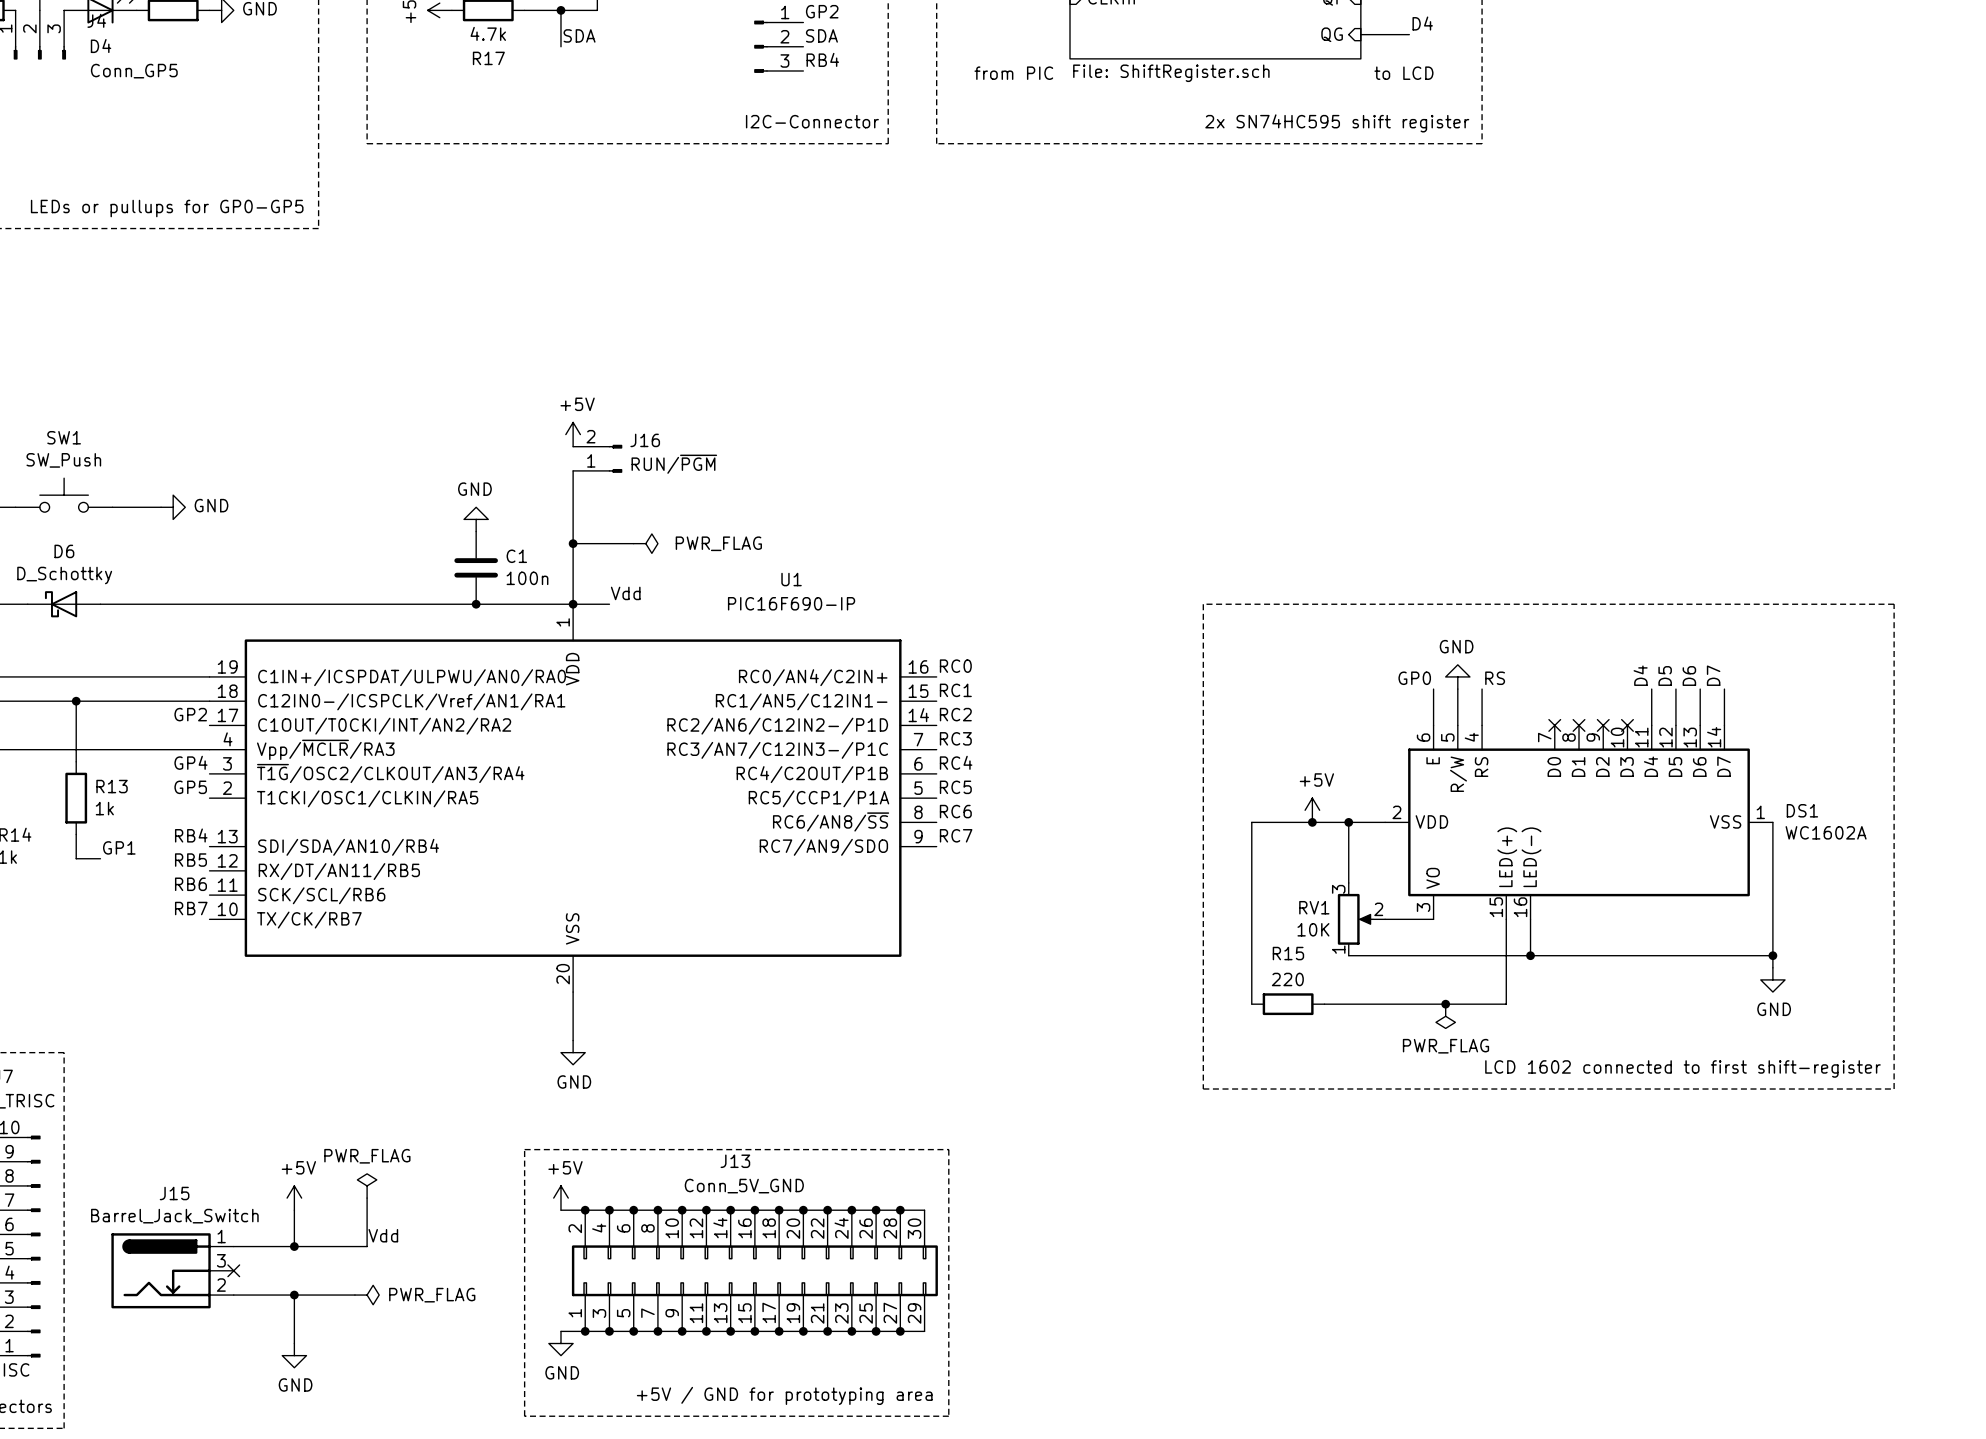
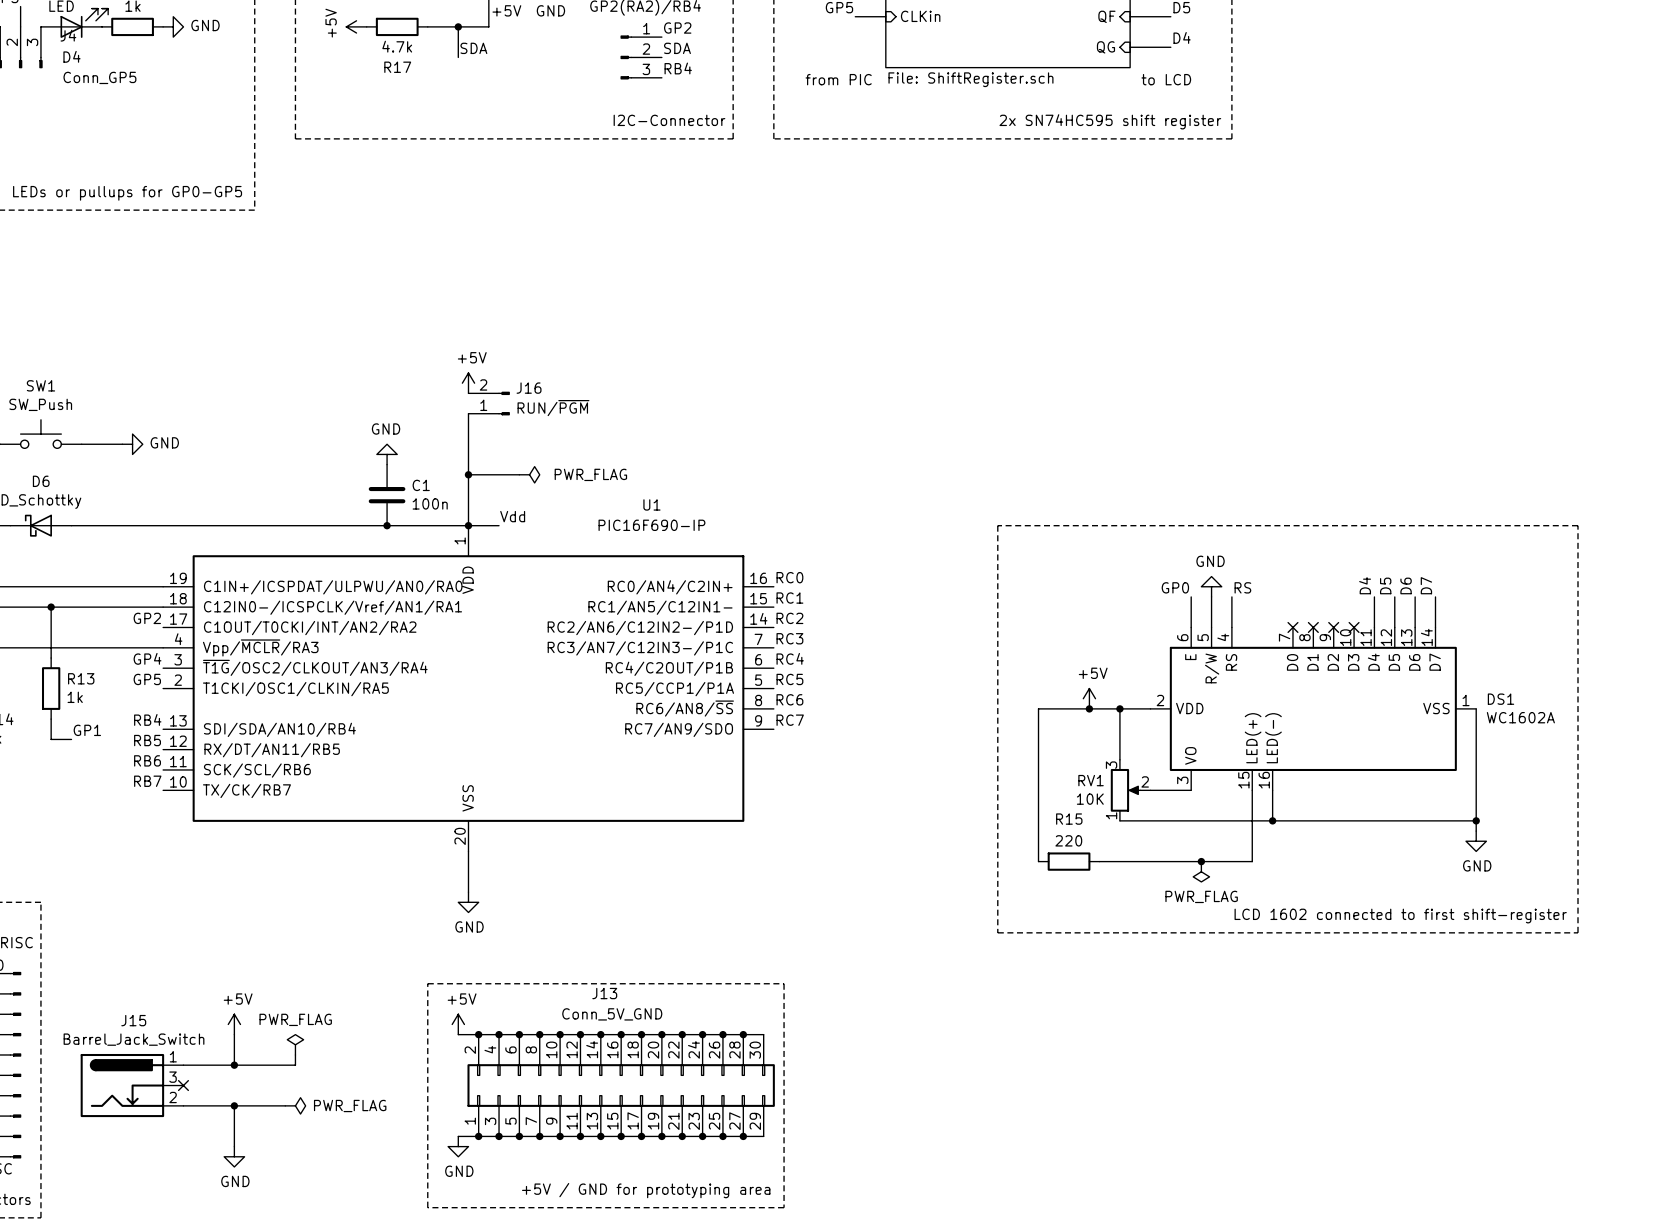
power symbol position: PWR_FLAG (367, 1185) -> PWR_FLAG (295, 1044)
wire: (367, 1198) (367, 1234) -> none
label: Vdd (383, 1235) -> none

